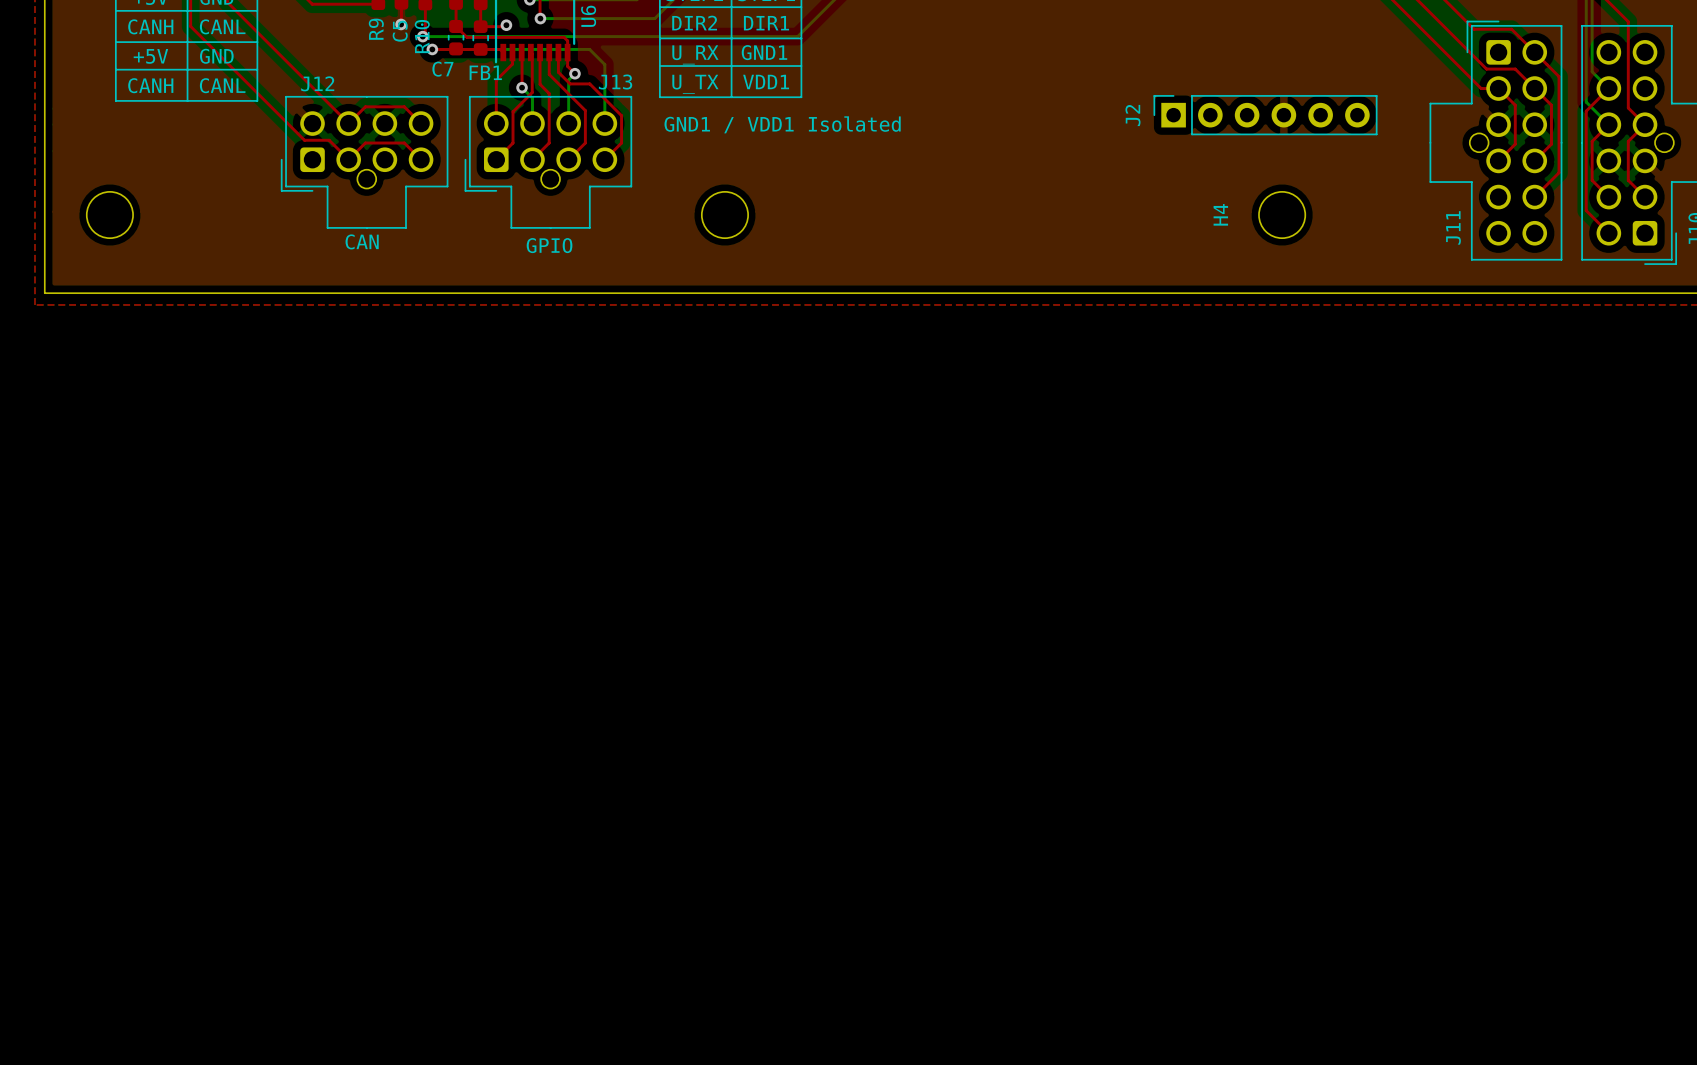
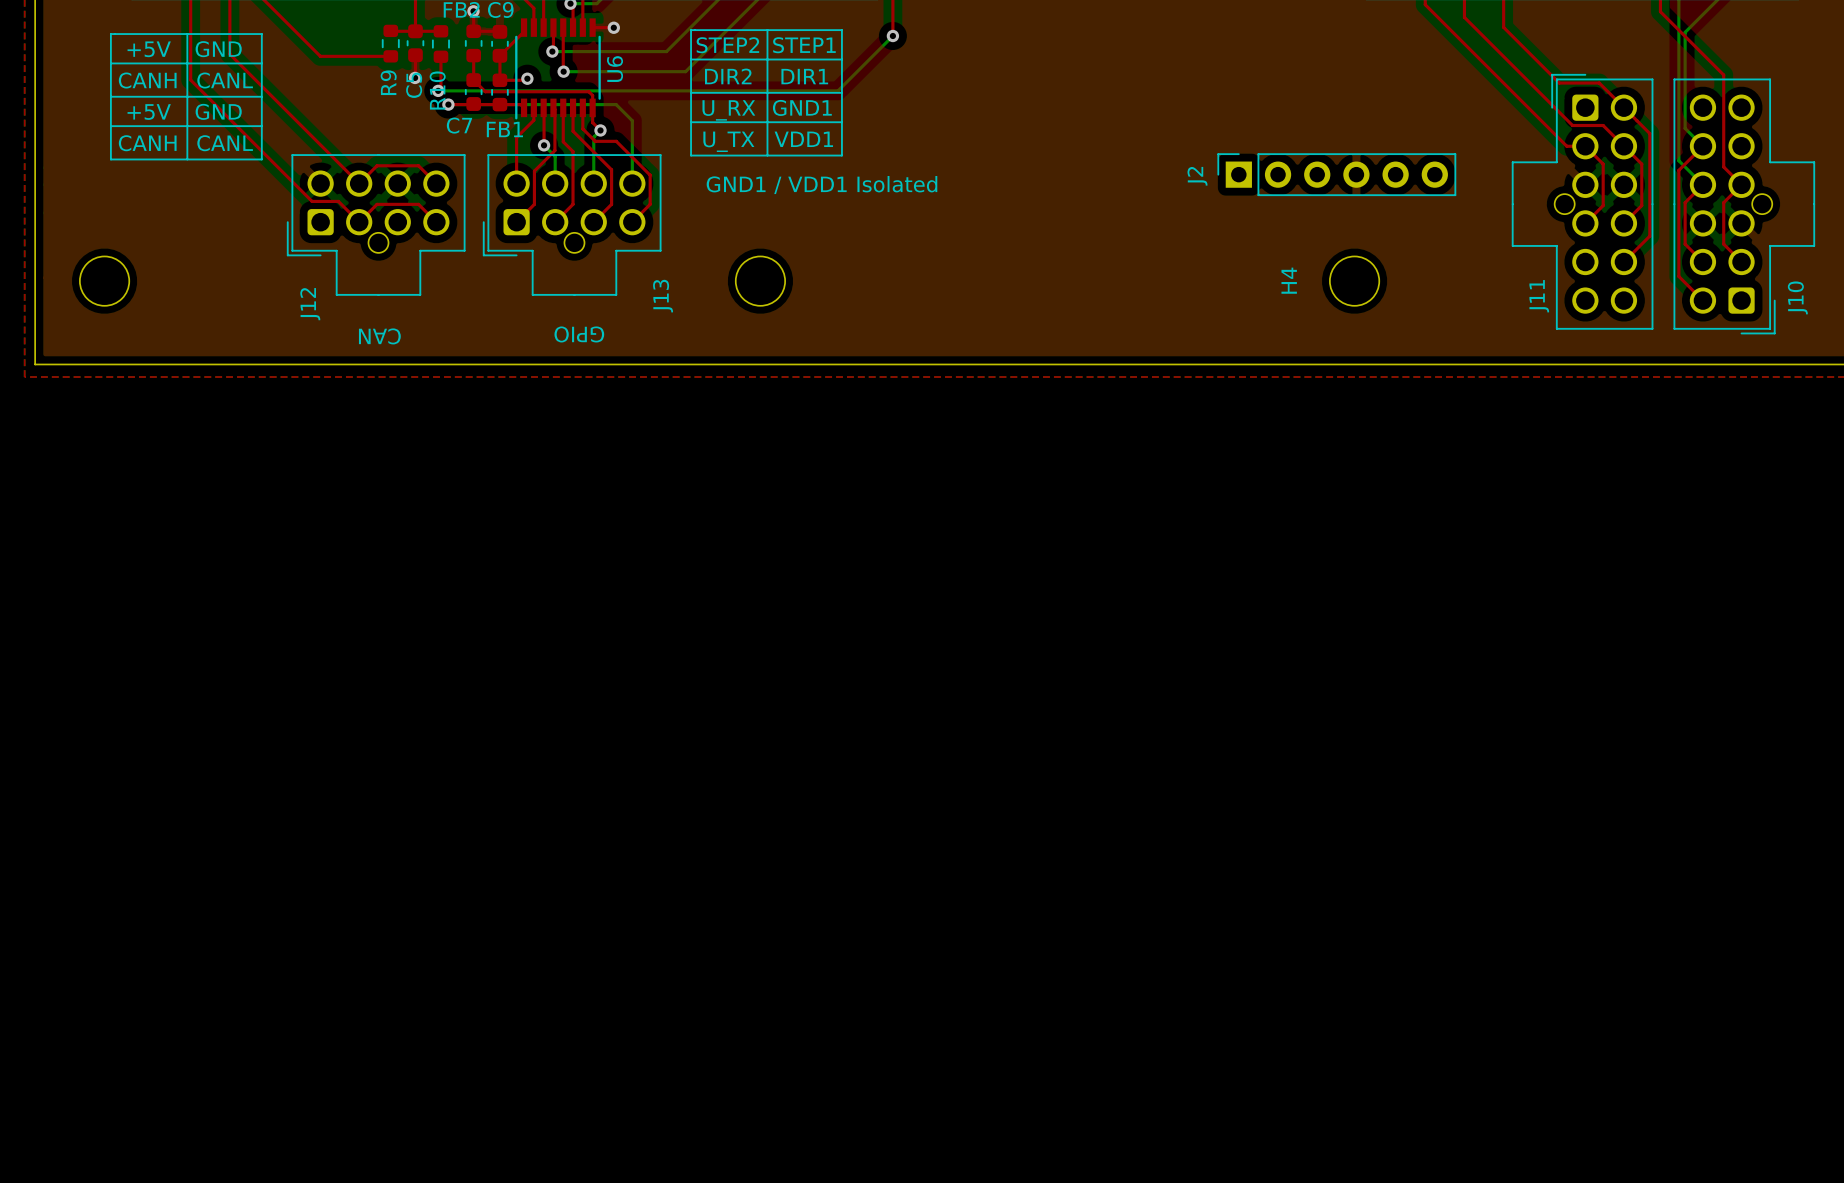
J13 name rotation: 0° (615, 82) -> 90° counterclockwise (663, 296)
J13 name position: J13 (615, 82) -> J13 (663, 296)
J12 name rotation: 0° (317, 83) -> 90° counterclockwise (310, 304)
J12 name position: J12 (317, 83) -> J12 (310, 304)
text rotation: 0° (362, 241) -> 180° (379, 336)
text rotation: 0° (549, 245) -> 180° (579, 334)

